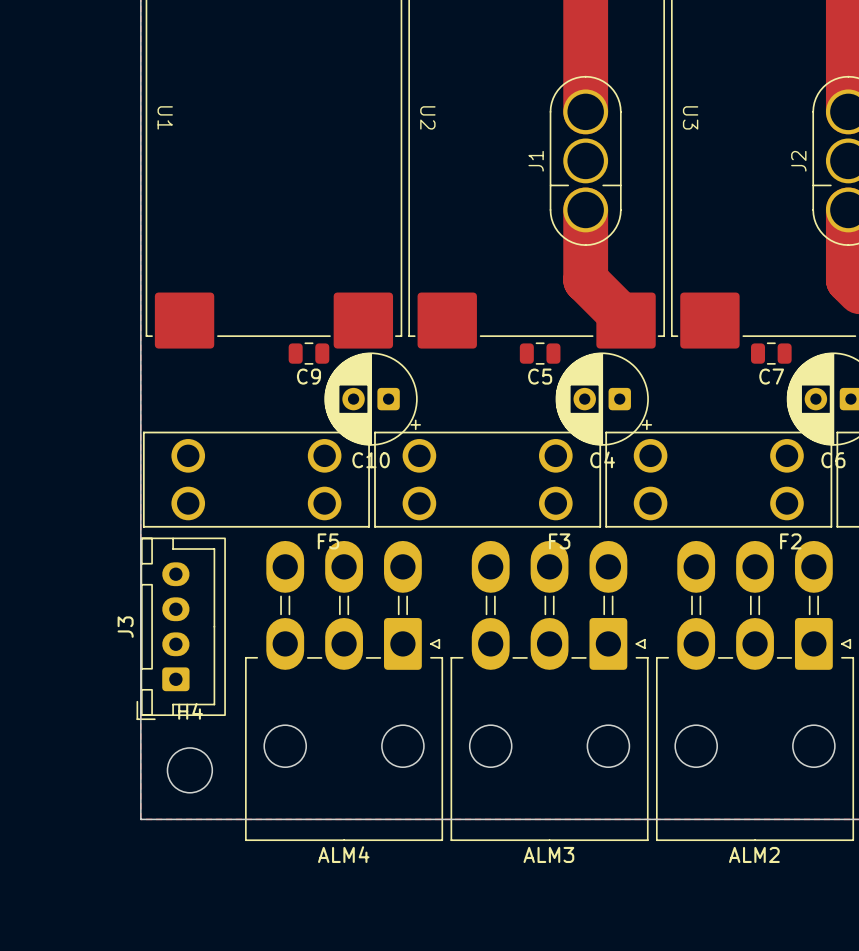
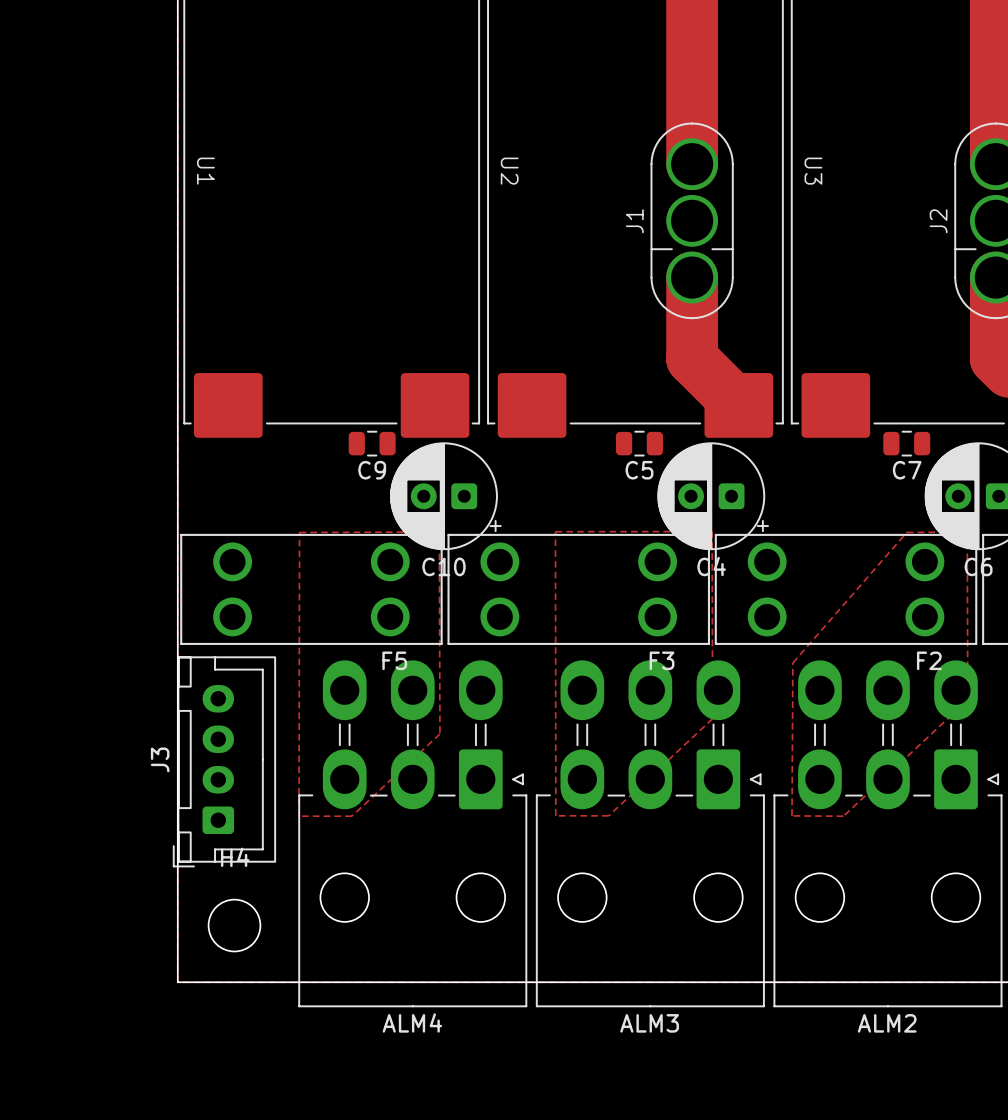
zone outline: none -> (712, 531) (555, 531) (555, 815) (608, 815) (712, 718) (712, 531)
zone outline: none -> (967, 531) (906, 532) (792, 662) (791, 815) (843, 816) (967, 699) (967, 531)
zone outline: none -> (439, 532) (299, 532) (299, 816) (351, 816) (439, 733) (439, 532)

